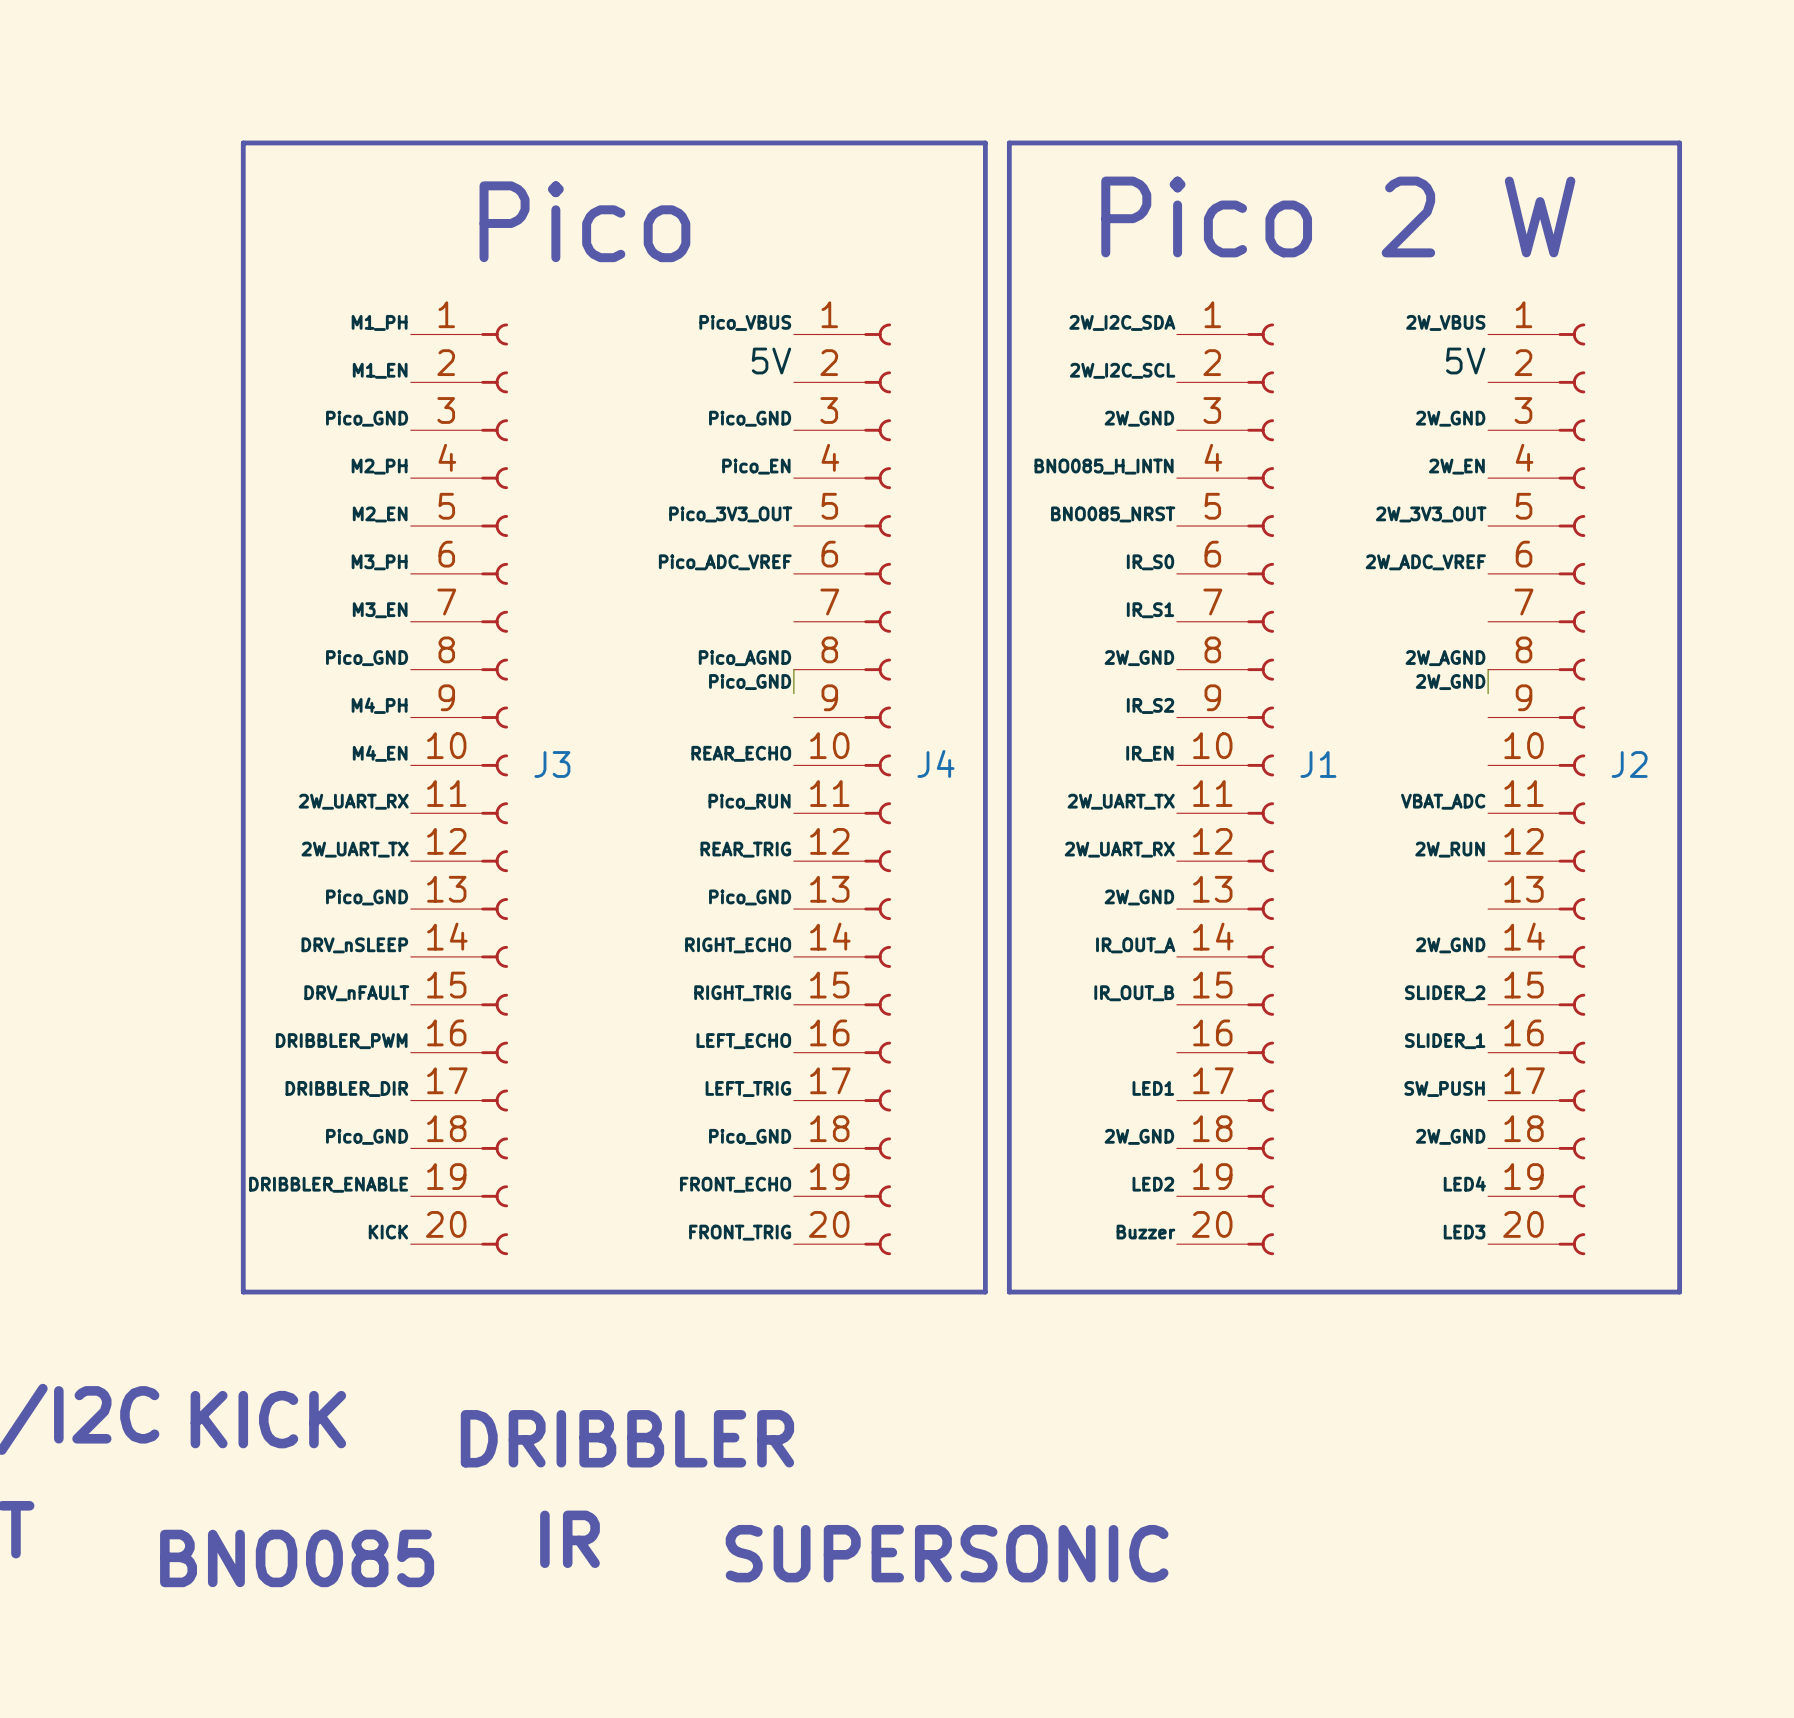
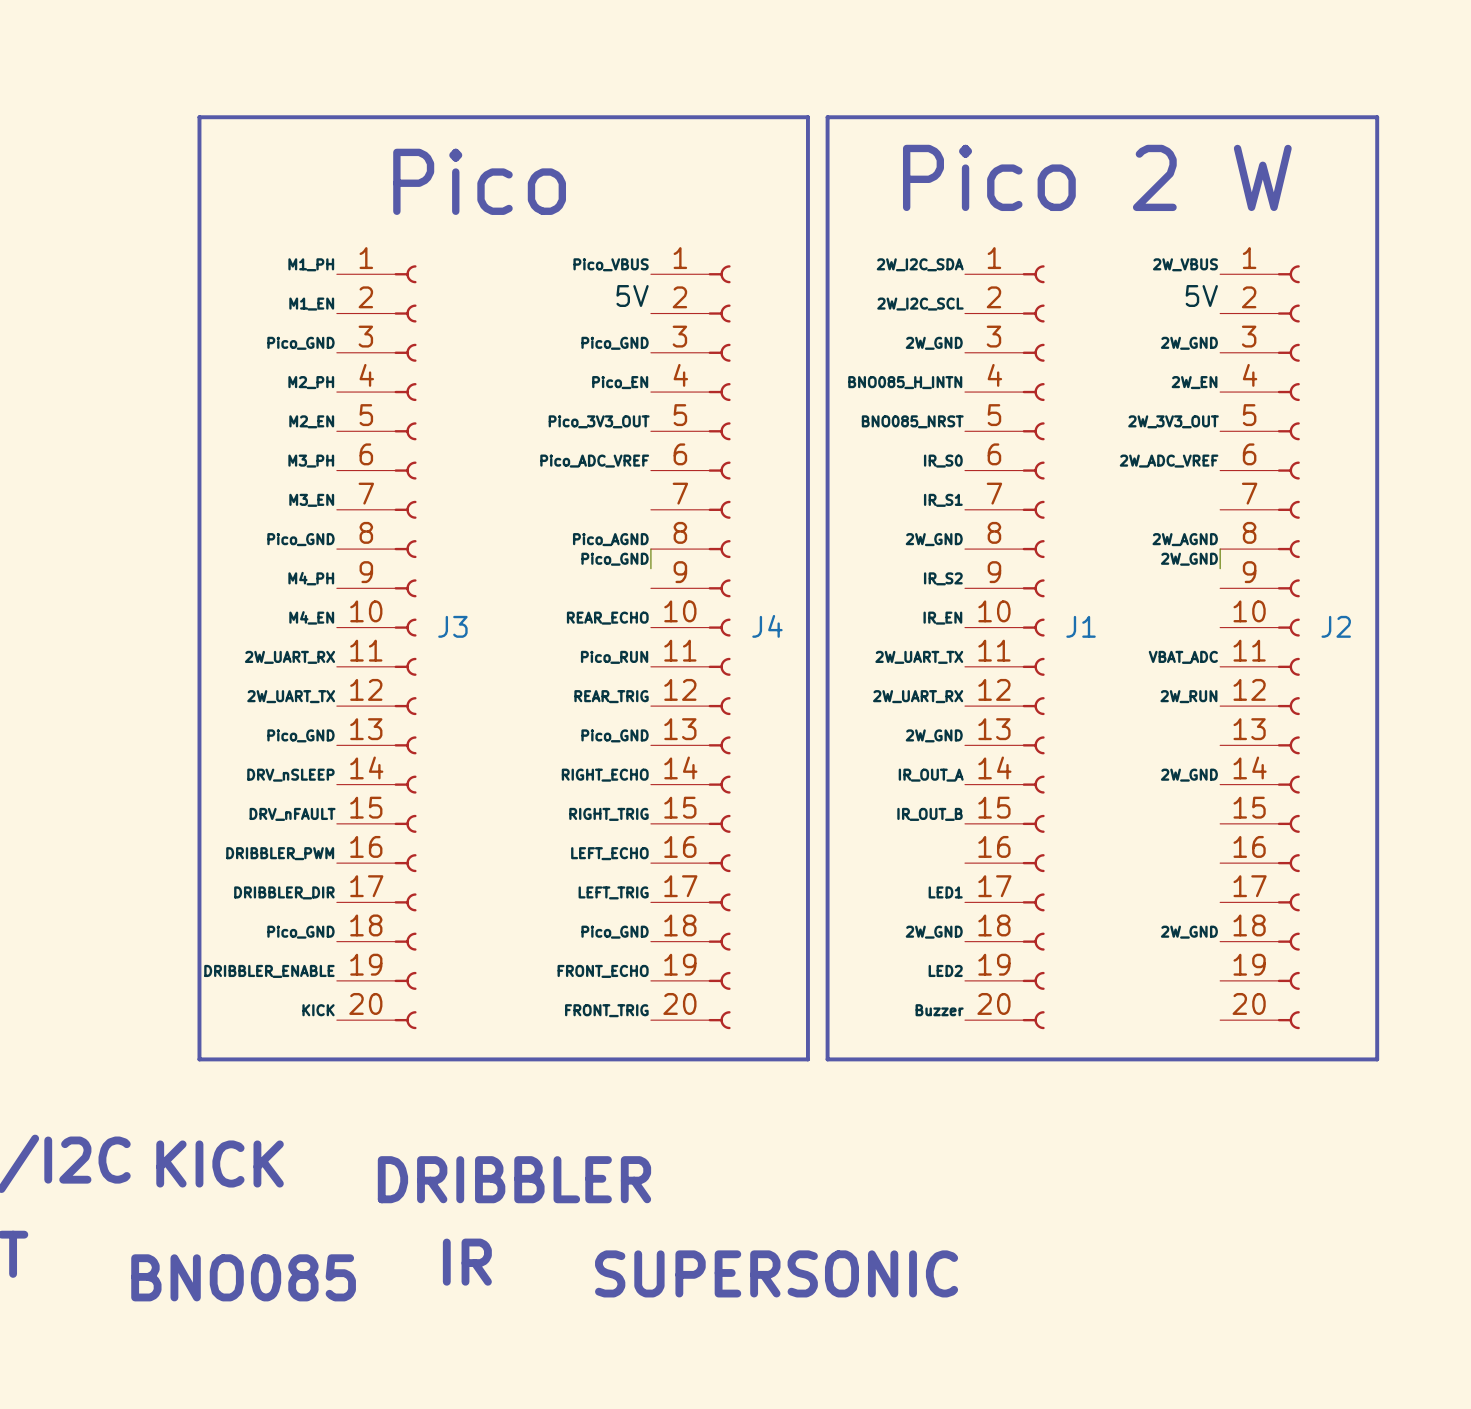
label: SLIDER_2 (1445, 993) -> none
label: SLIDER_1 (1445, 1041) -> none
label: SW_PUSH (1444, 1088) -> none
label: LED4 (1464, 1183) -> none
label: LED3 (1464, 1232) -> none

